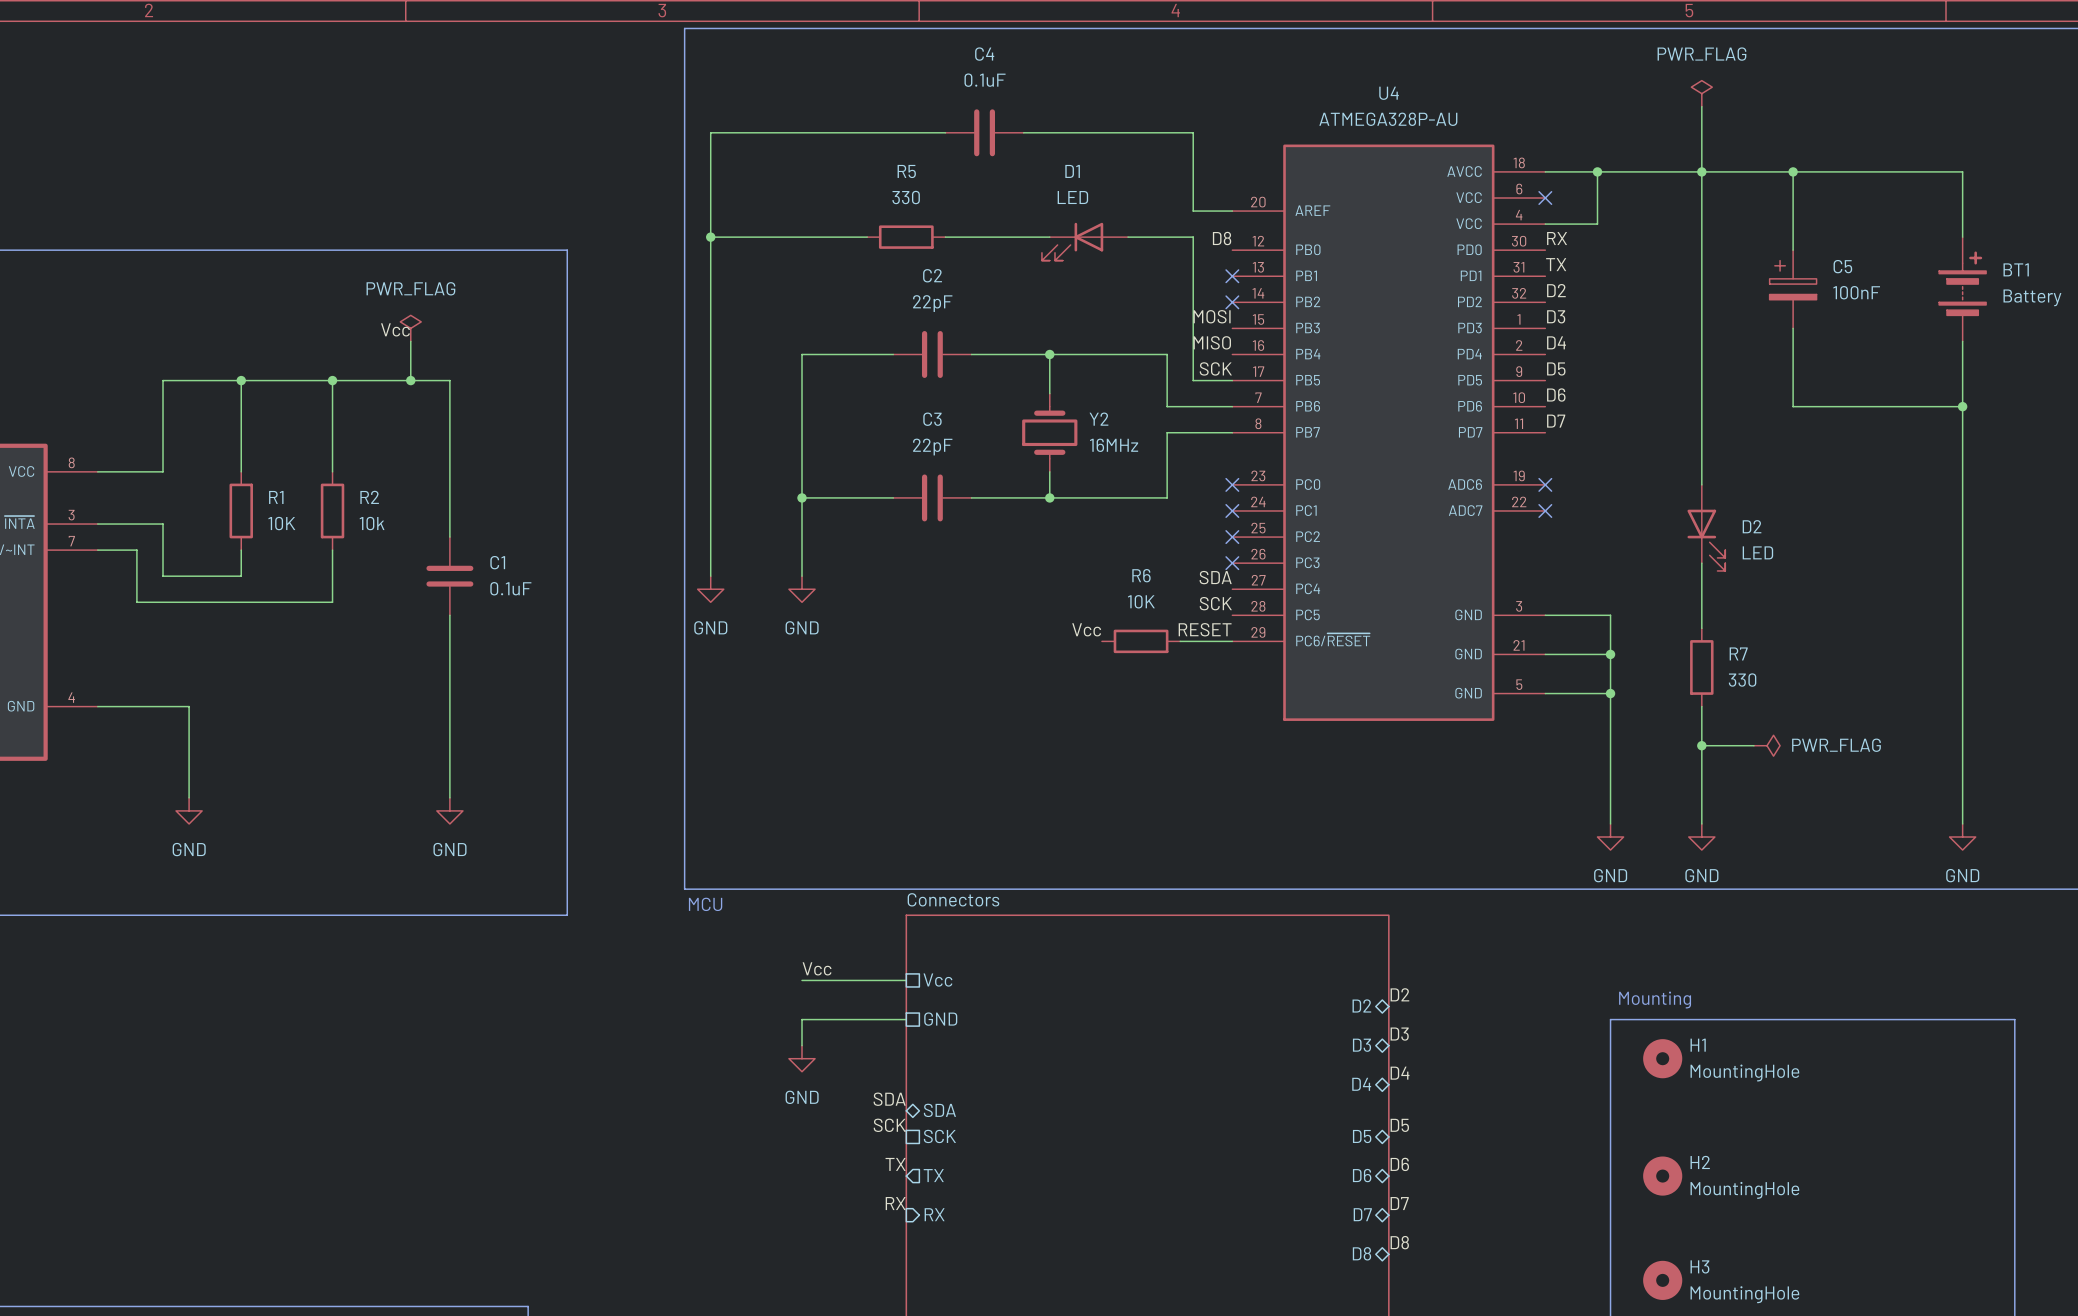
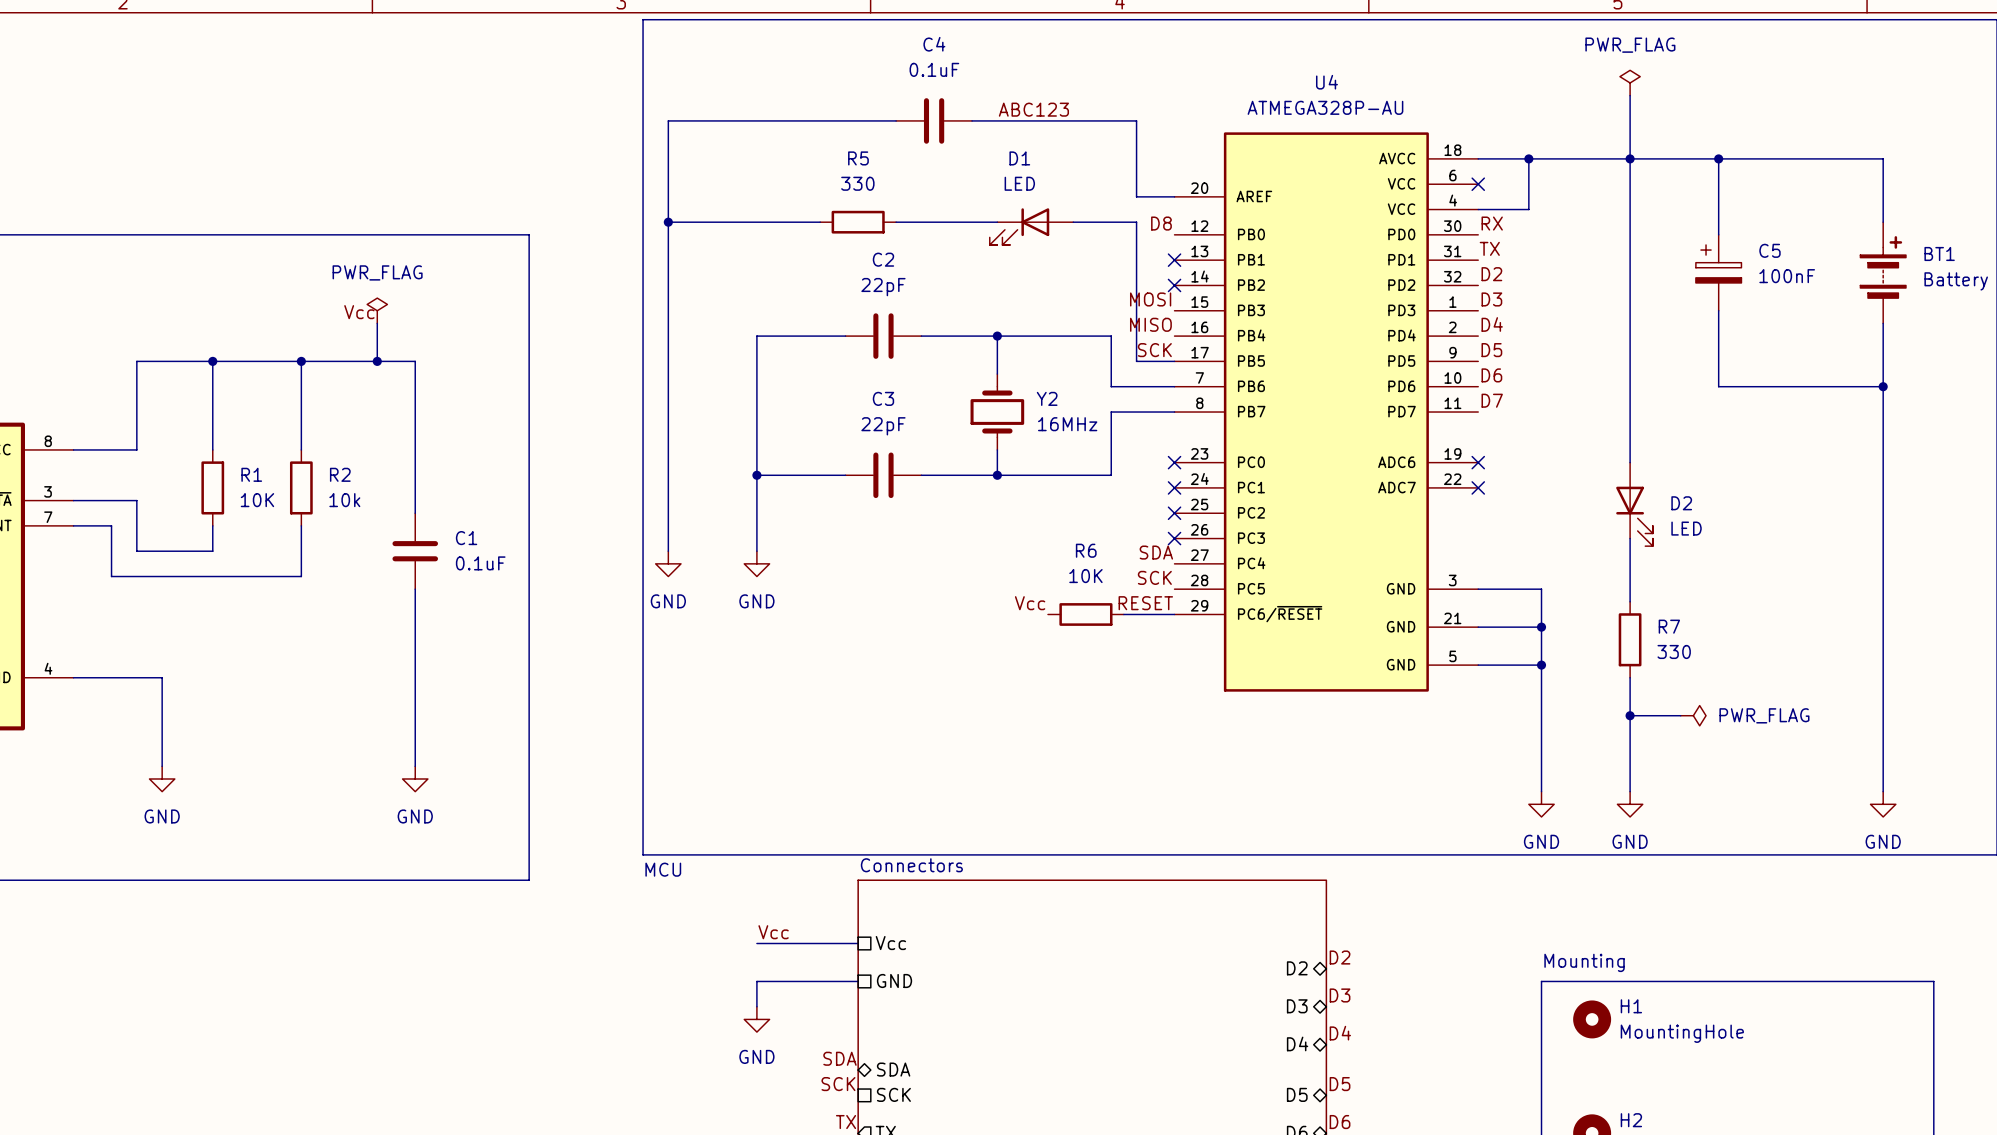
label: none -> ABC123 (1033, 109)

